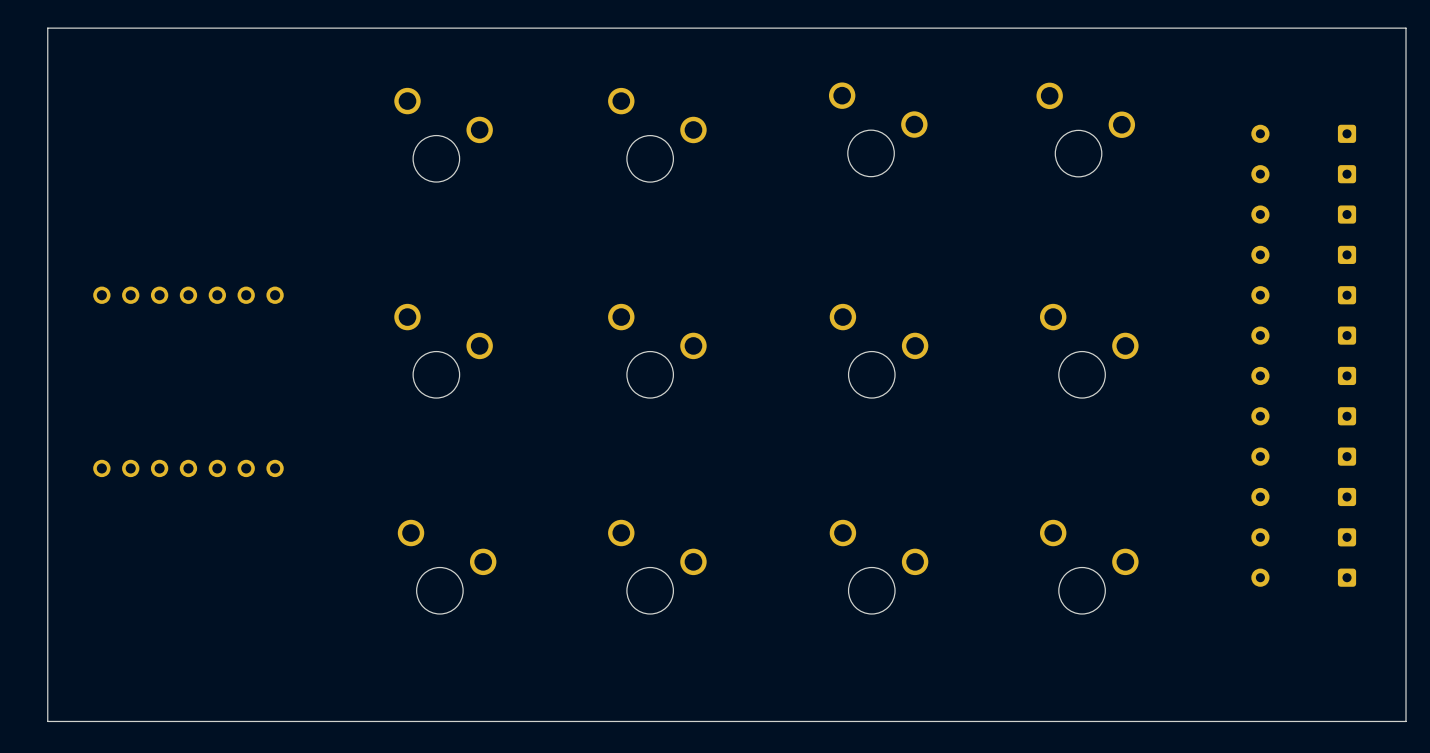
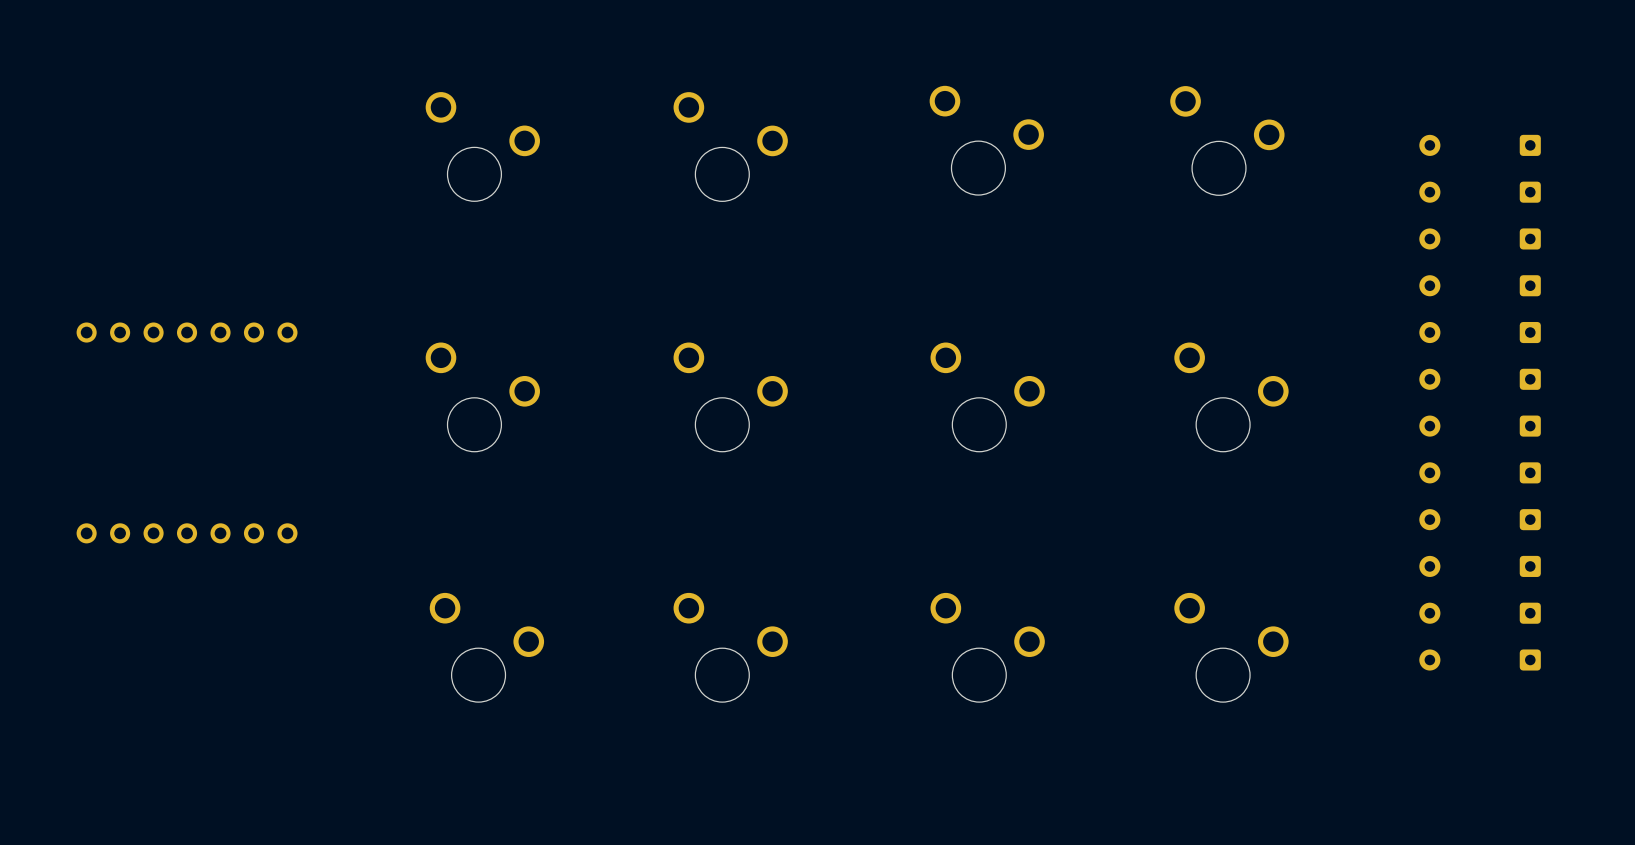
board edge: (1406, 28) (47, 28) (47, 721) (1406, 721) (1406, 28) -> none

